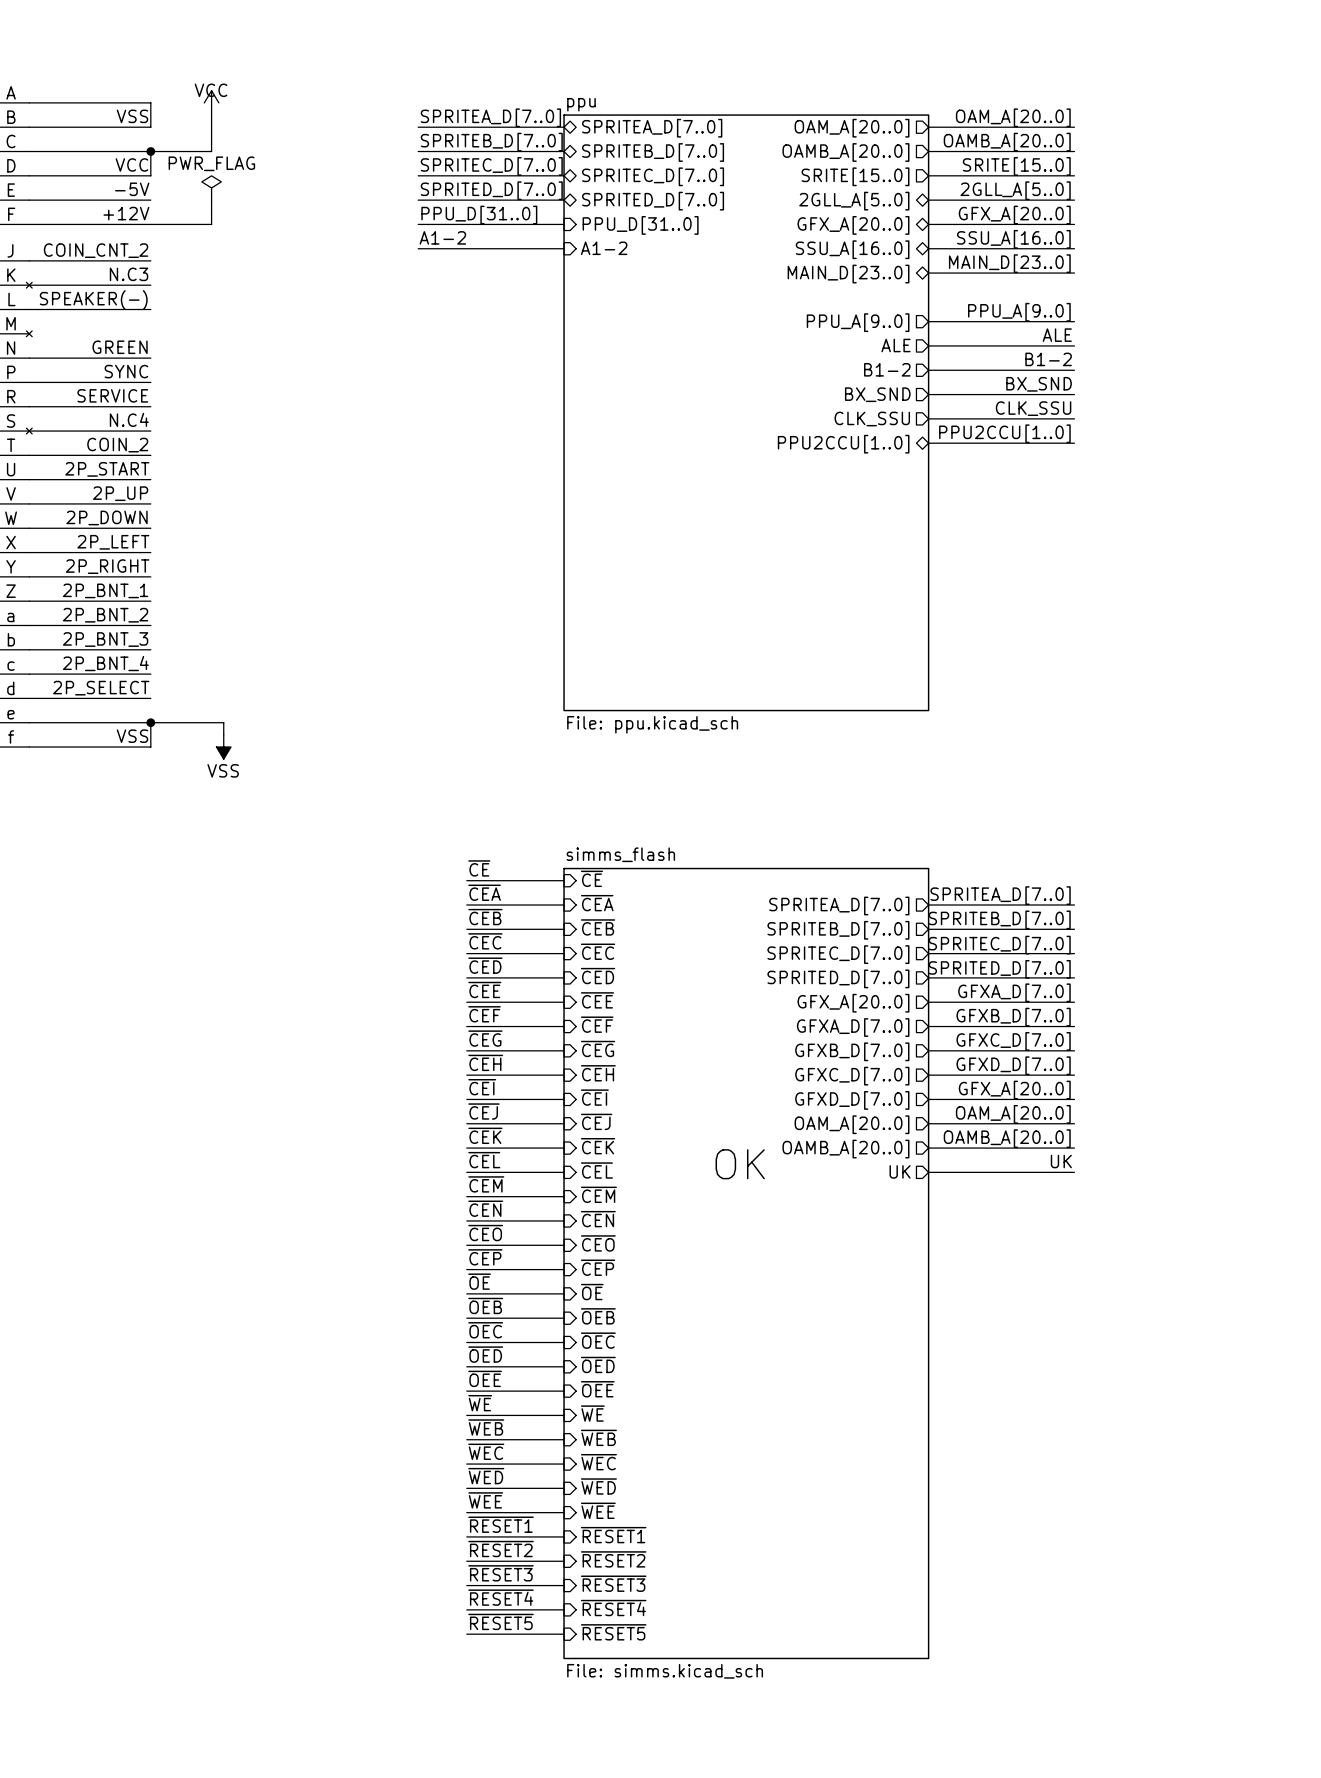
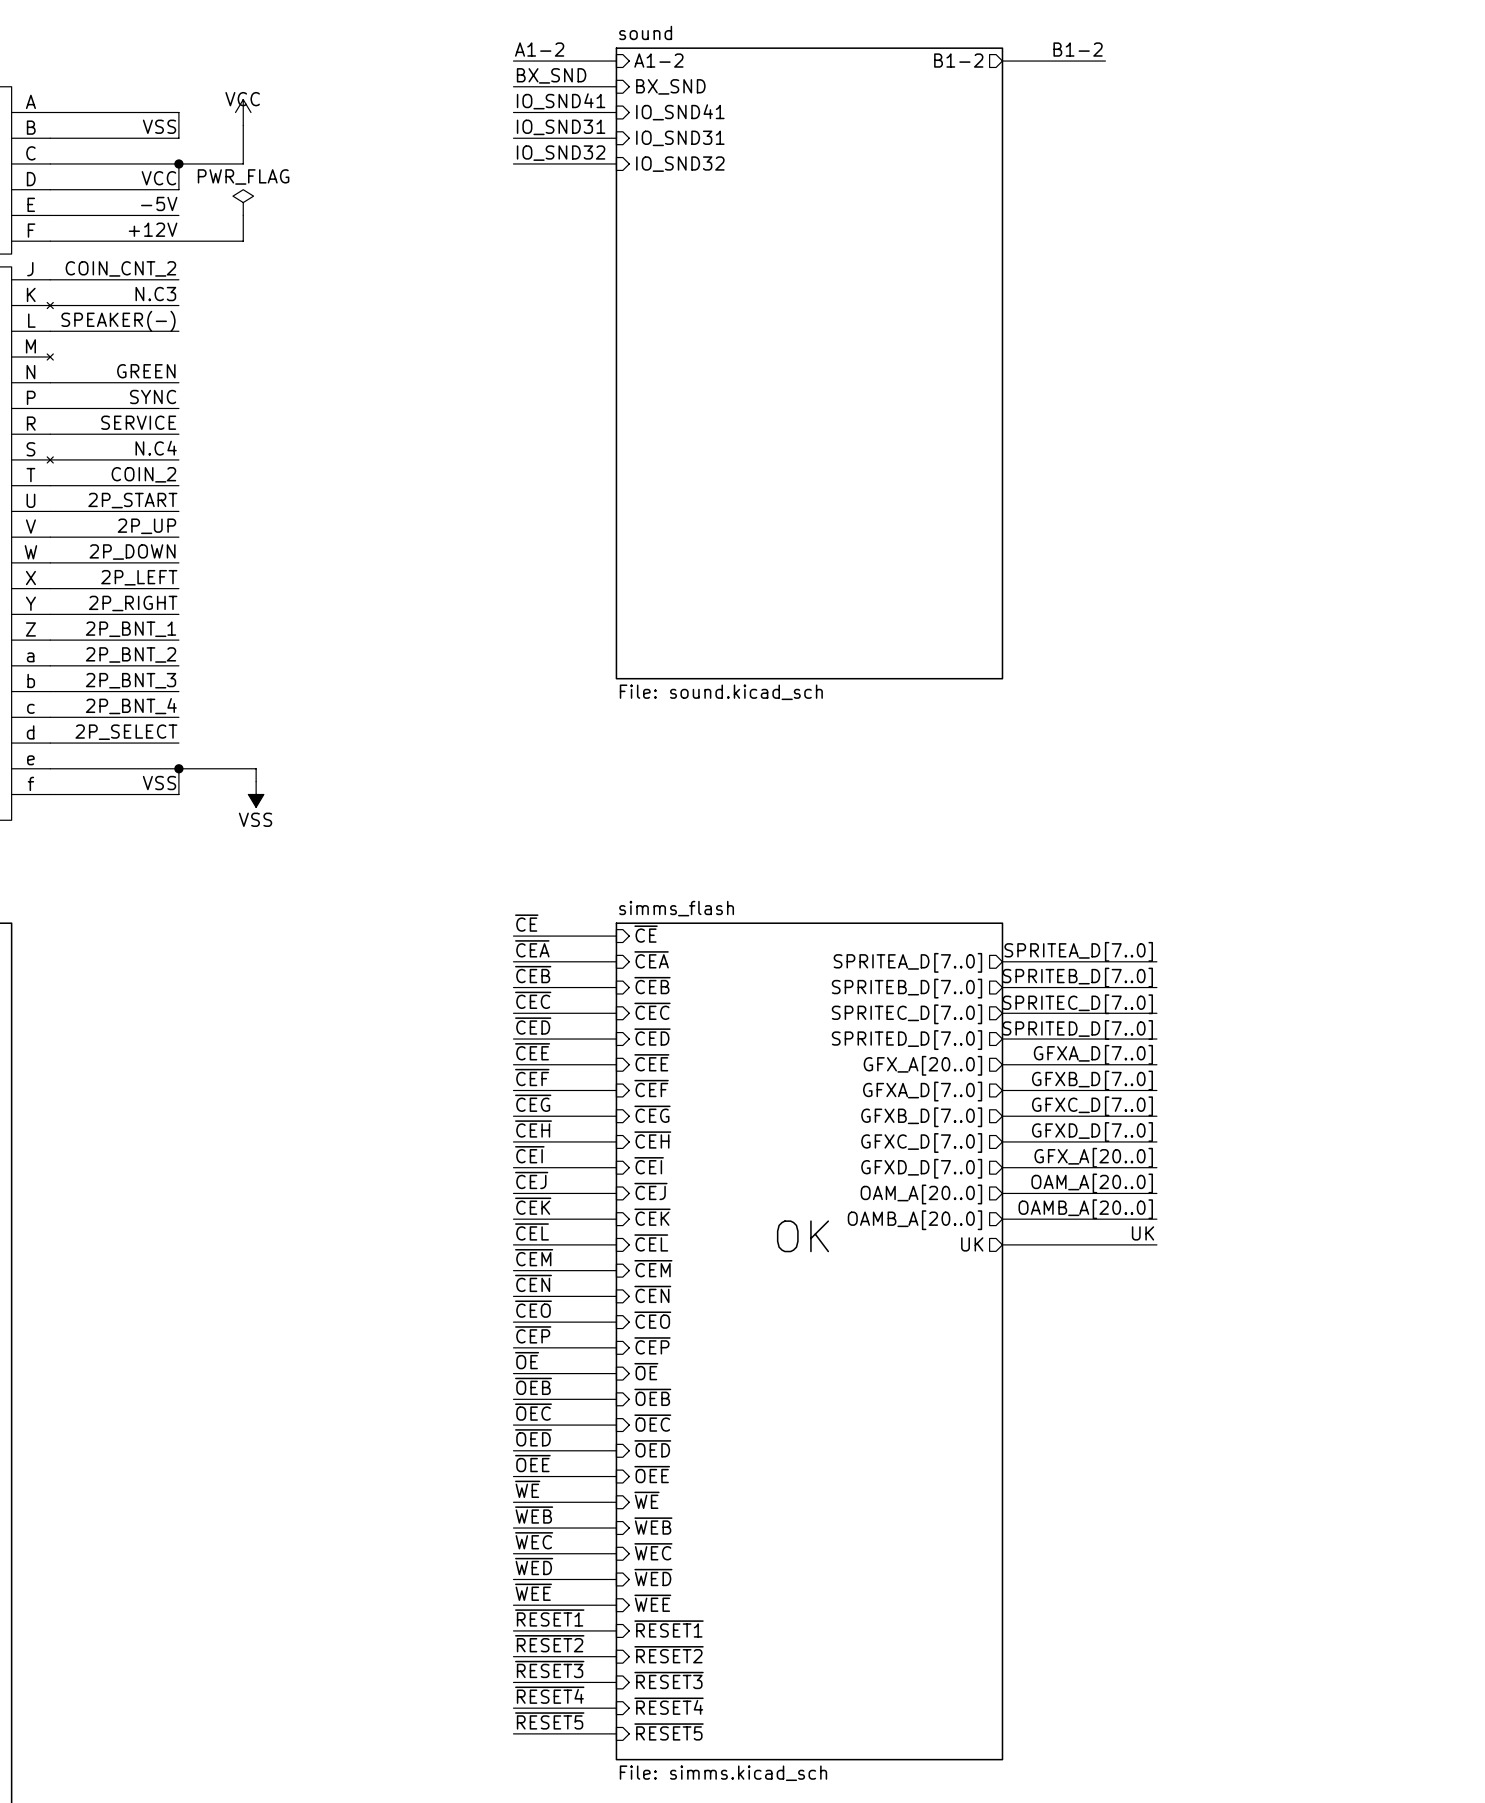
label: none -> B1-2 (1078, 49)
sheet pin: none -> B1-2 (958, 60)
wire: none -> (513, 61) (616, 61)
wire: none -> (1002, 61) (1105, 61)
label: none -> BX_SND (551, 75)
wire: none -> (513, 86) (616, 86)
sheet pin: none -> BX_SND (670, 86)
label: none -> IO_SND41 (561, 101)
wire: none -> (513, 112) (616, 112)
sheet pin: none -> IO_SND41 (680, 112)
label: none -> IO_SND31 (561, 127)
label: SPRITEA_D[7..0] (490, 117) -> none
label: OAM_A[20..0] (1013, 117) -> none
bus: (418, 127) (564, 127) -> none
bus: (928, 127) (1074, 127) -> none
sheet pin shape: bidirectional (652, 128) -> input (680, 138)
sheet pin: SPRITEA_D[7..0] (652, 128) -> IO_SND31 (680, 138)
sheet pin: OAM_A[20..0] (852, 128) -> none
label: none -> IO_SND32 (561, 153)
label: SPRITEB_D[7..0] (491, 142) -> none
label: OAMB_A[20..0] (1007, 142) -> none
bus: (418, 151) (564, 151) -> none
bus: (928, 151) (1074, 151) -> none
sheet pin shape: bidirectional (653, 152) -> input (680, 164)
sheet pin: SPRITEB_D[7..0] (653, 152) -> IO_SND32 (680, 164)
sheet pin: OAMB_A[20..0] (845, 152) -> none
label: SPRITEC_D[7..0] (491, 166) -> none
label: SRITE[15..0] (1016, 166) -> none
bus: (418, 175) (564, 175) -> none
bus: (928, 175) (1074, 175) -> none
sheet pin: SPRITEC_D[7..0] (653, 176) -> none
sheet pin: SRITE[15..0] (855, 176) -> none
label: SPRITED_D[7..0] (491, 190) -> none
label: 2GLL_A[5..0] (1015, 190) -> none
bus: (418, 200) (564, 200) -> none
bus: (928, 200) (1074, 200) -> none
sheet pin: SPRITED_D[7..0] (653, 201) -> none
sheet pin: 2GLL_A[5..0] (854, 201) -> none
label: PPU_D[31..0] (479, 215) -> none
label: GFX_A[20..0] (1014, 215) -> none
bus: (418, 224) (564, 224) -> none
bus: (928, 224) (1074, 224) -> none
sheet pin: PPU_D[31..0] (640, 225) -> none
sheet pin: GFX_A[20..0] (853, 225) -> none
label position: A1-2 (442, 237) -> A1-2 (539, 49)
label: SSU_A[16..0] (1013, 239) -> none
wire: (418, 248) (564, 248) -> none
sheet pin position: A1-2 (604, 248) -> A1-2 (658, 60)
bus: (928, 248) (1074, 248) -> none
sheet pin: SSU_A[16..0] (852, 249) -> none
label: MAIN_D[23..0] (1009, 263) -> none
bus: (928, 273) (1074, 273) -> none
sheet pin: MAIN_D[23..0] (848, 274) -> none
label: PPU_A[9..0] (1019, 312) -> none
bus: (928, 321) (1074, 321) -> none
sheet pin: PPU_A[9..0] (858, 322) -> none
label: ALE (1057, 335) -> none
sheet sound: none -> File: sound.kicad_sch (809, 363)
sheet pin: ALE (896, 345) -> none
wire: (928, 345) (1074, 345) -> none
label: B1-2 (1048, 359) -> none
sheet pin: B1-2 (887, 369) -> none
wire: (928, 370) (1074, 370) -> none
label: BX_SND (1039, 384) -> none
sheet pin: BX_SND (877, 394) -> none
wire: (928, 394) (1074, 394) -> none
label: CLK_SSU (1033, 408) -> none
sheet ppu: File: ppu.kicad_sch (746, 412) -> none
wire: (928, 418) (1074, 418) -> none
sheet pin: CLK_SSU (872, 419) -> none
label: PPU2CCU[1..0] (1004, 433) -> none
bus: (928, 443) (1074, 443) -> none
sheet pin: PPU2CCU[1..0] (843, 444) -> none

